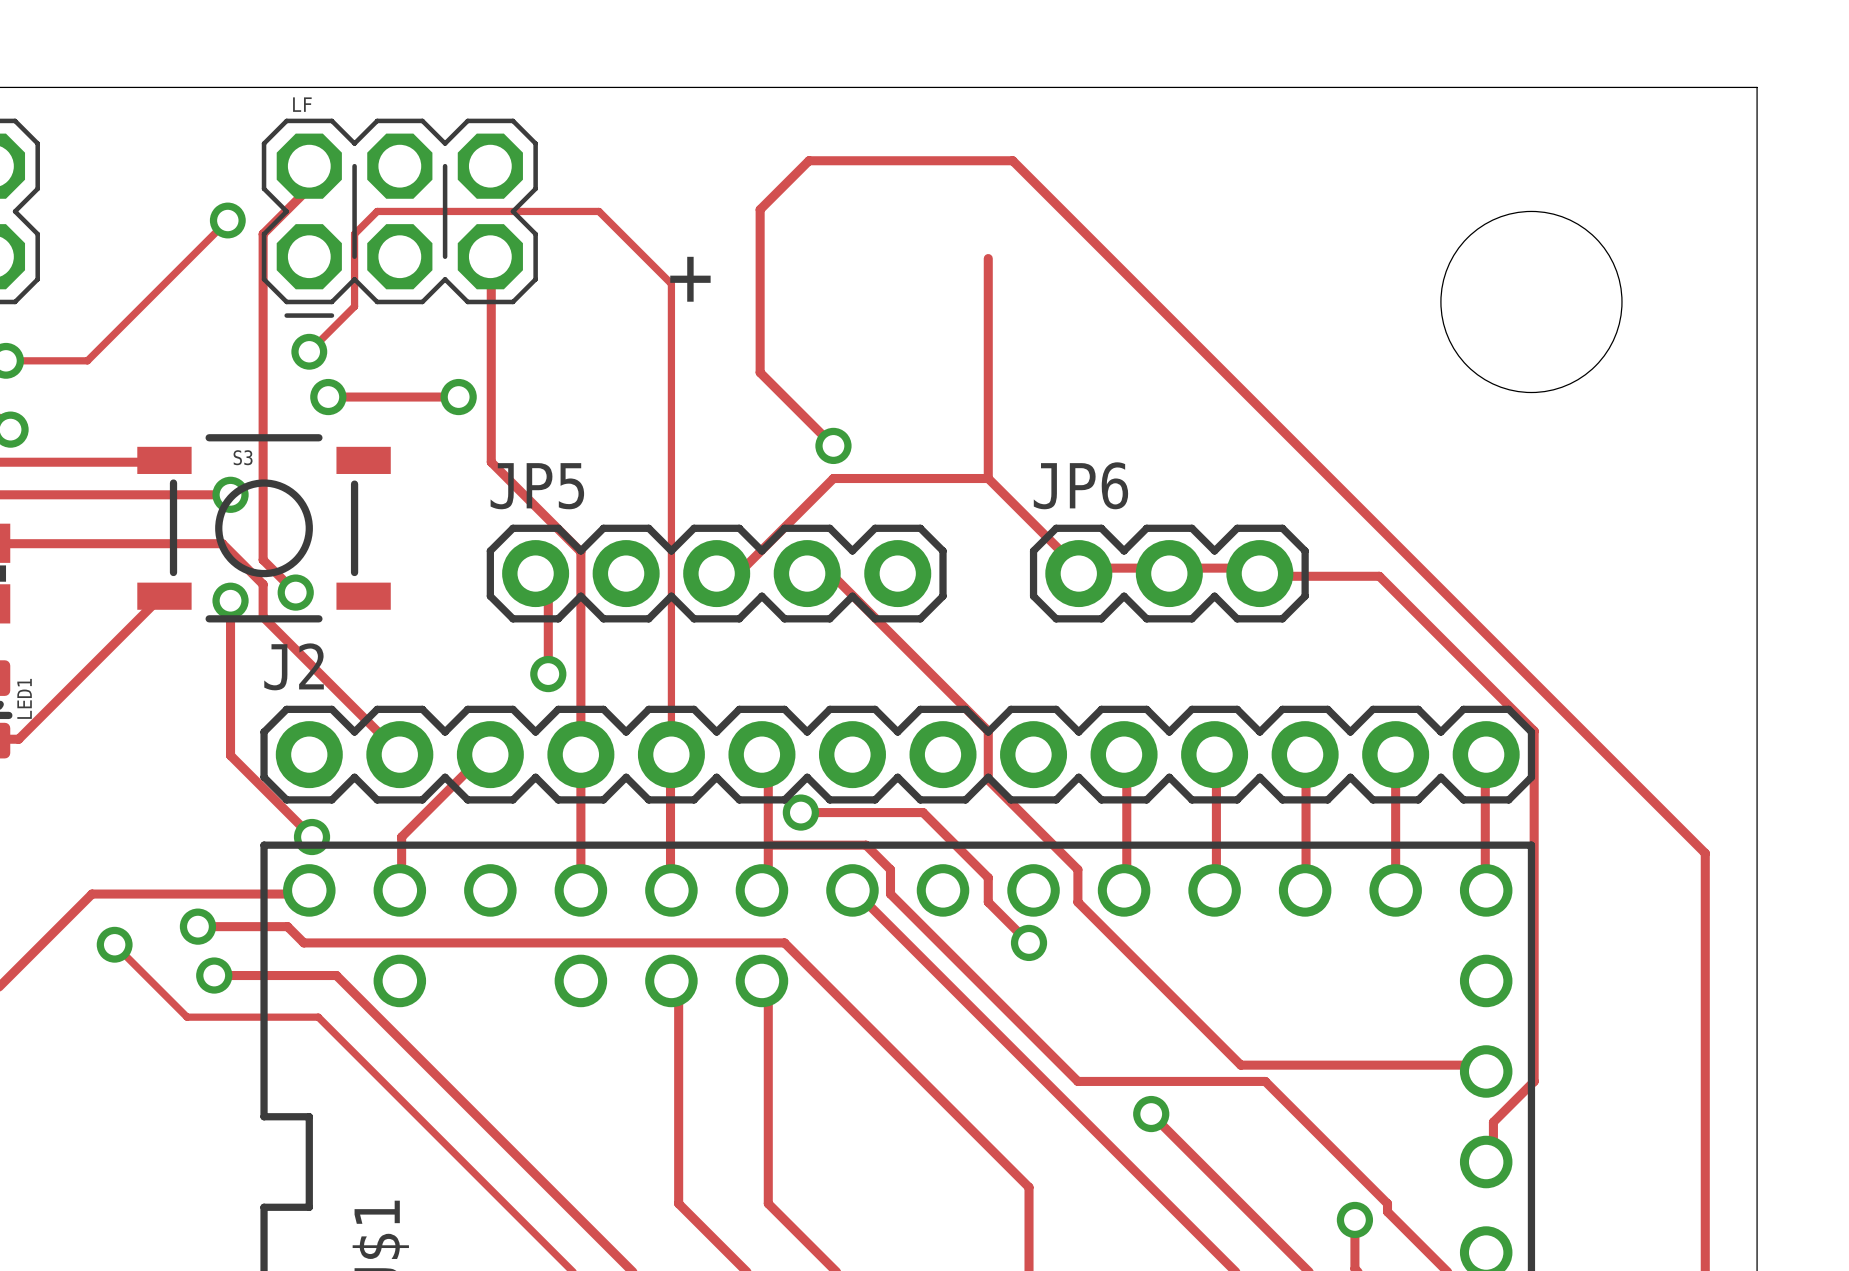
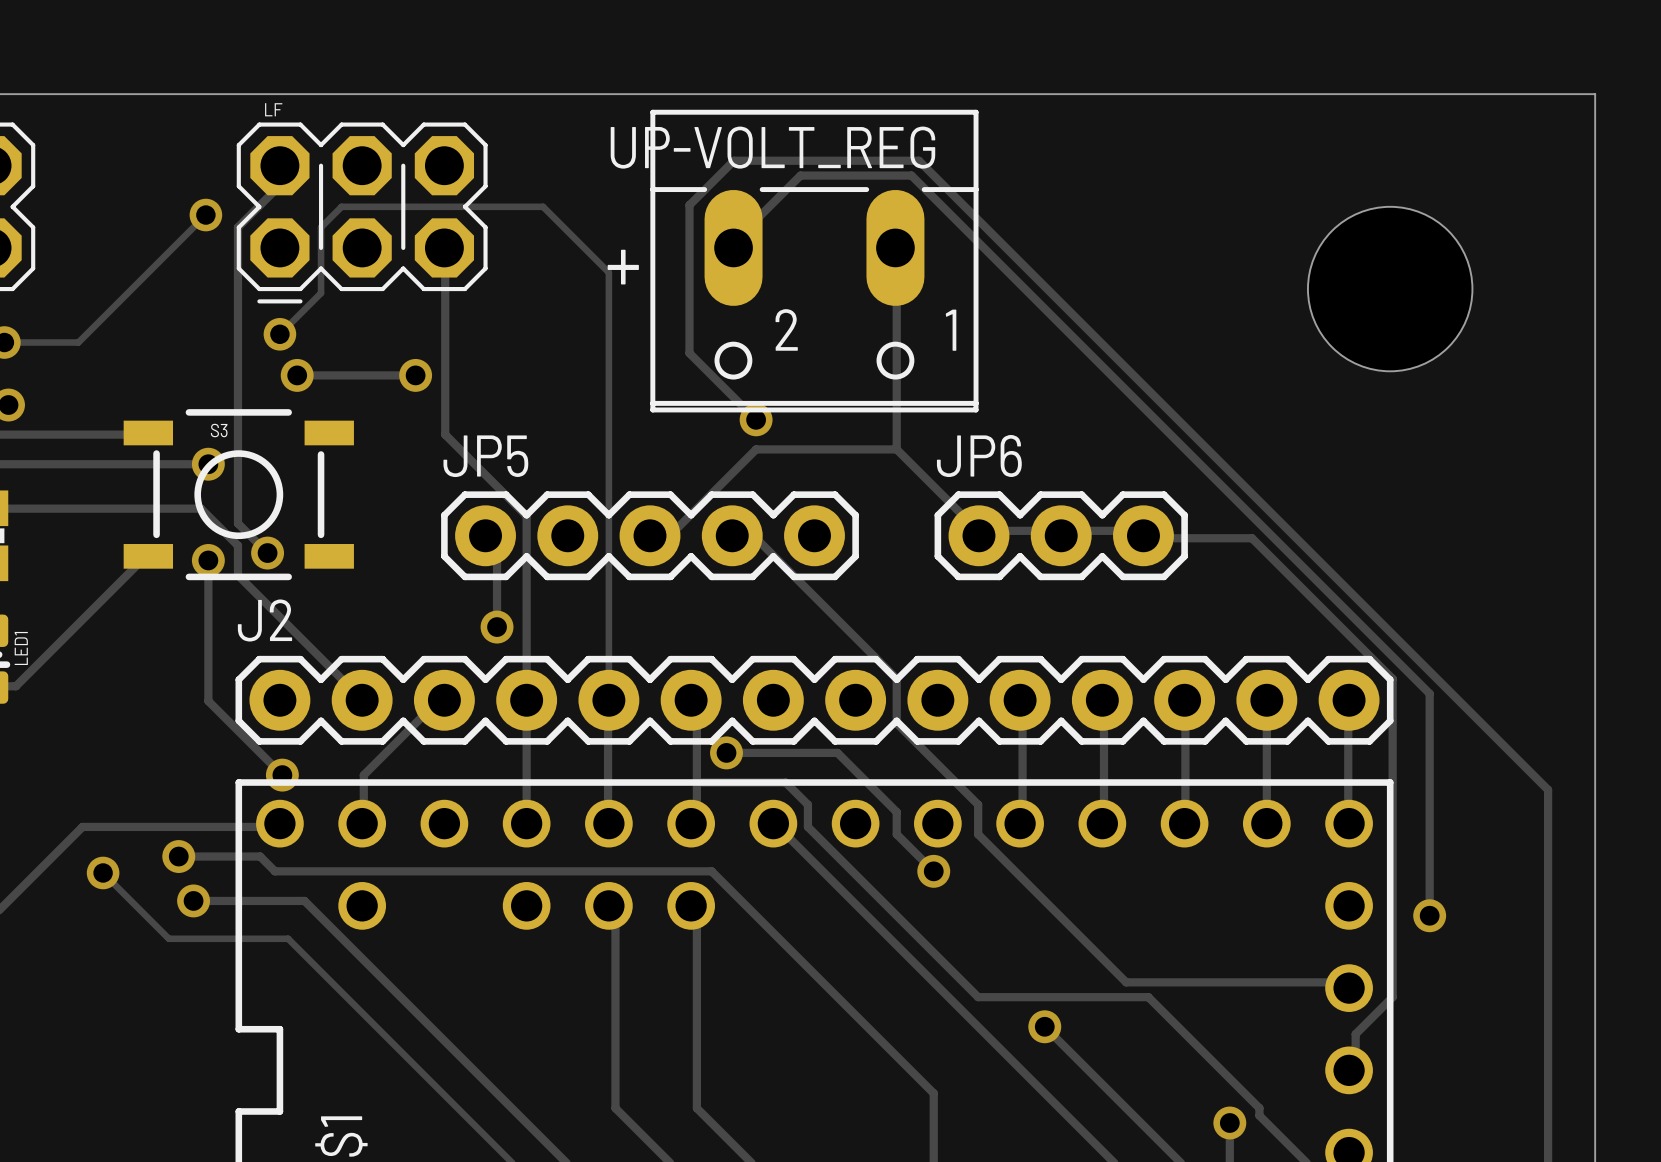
track: none -> (733, 247) (733, 242) (800, 175) (911, 175) (1429, 693) (1429, 915)
UP-VOLT_REG: none -> (814, 261)
via: none -> (1429, 915)

